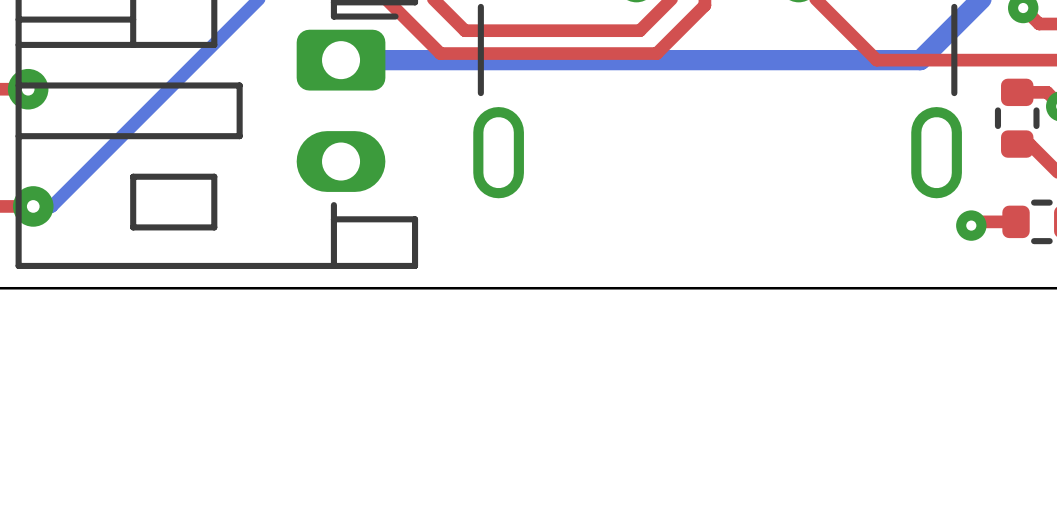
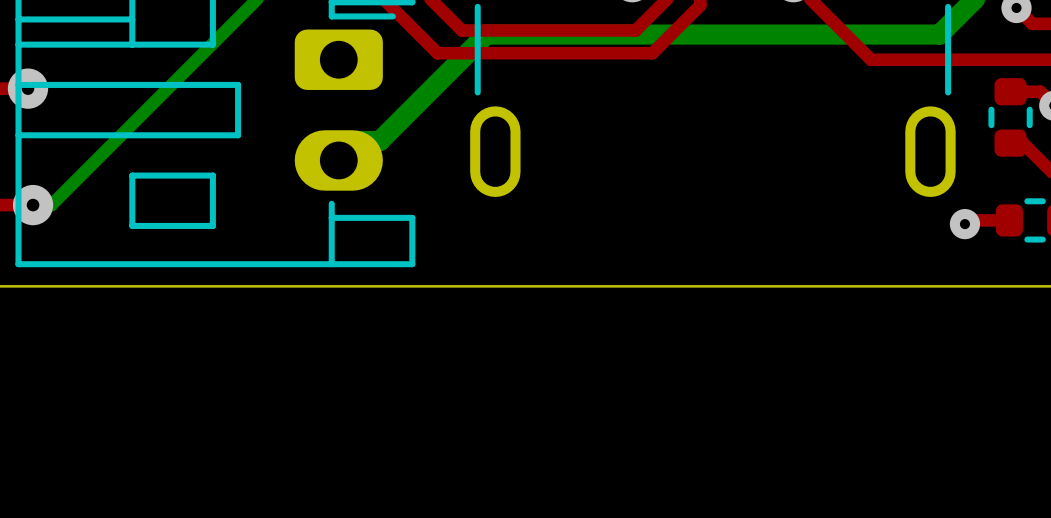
bottom track: (945, 34) (920, 60) (341, 60) -> (939, 34) (486, 34) (379, 141) (338, 141)

